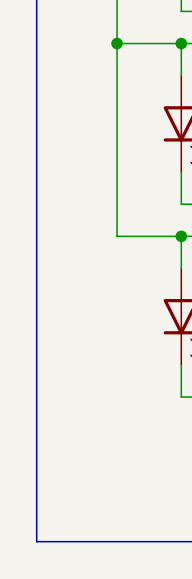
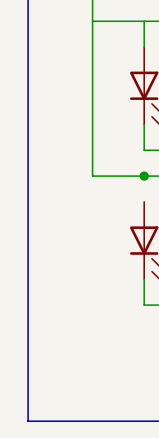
junction: (117, 43) -> none
junction: (181, 43) -> none
wire: (181, 236) (181, 268) -> none

